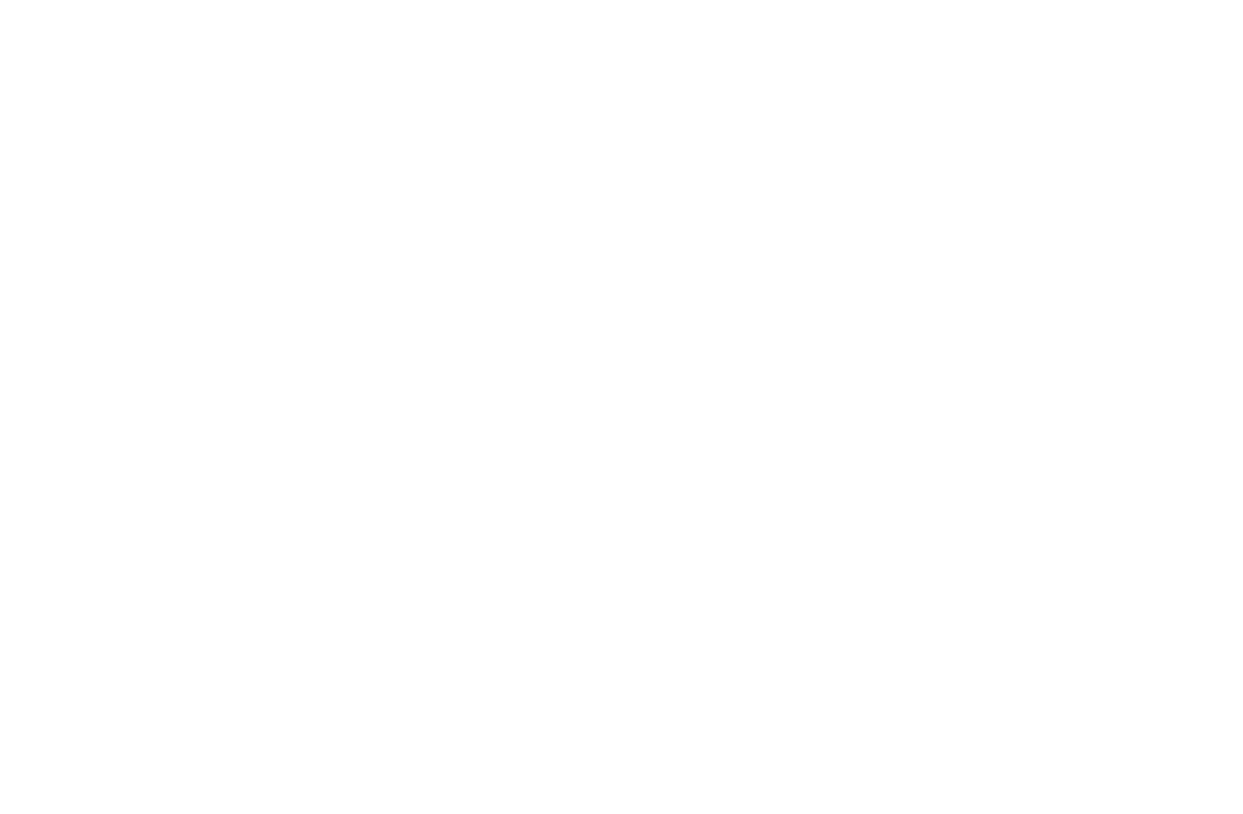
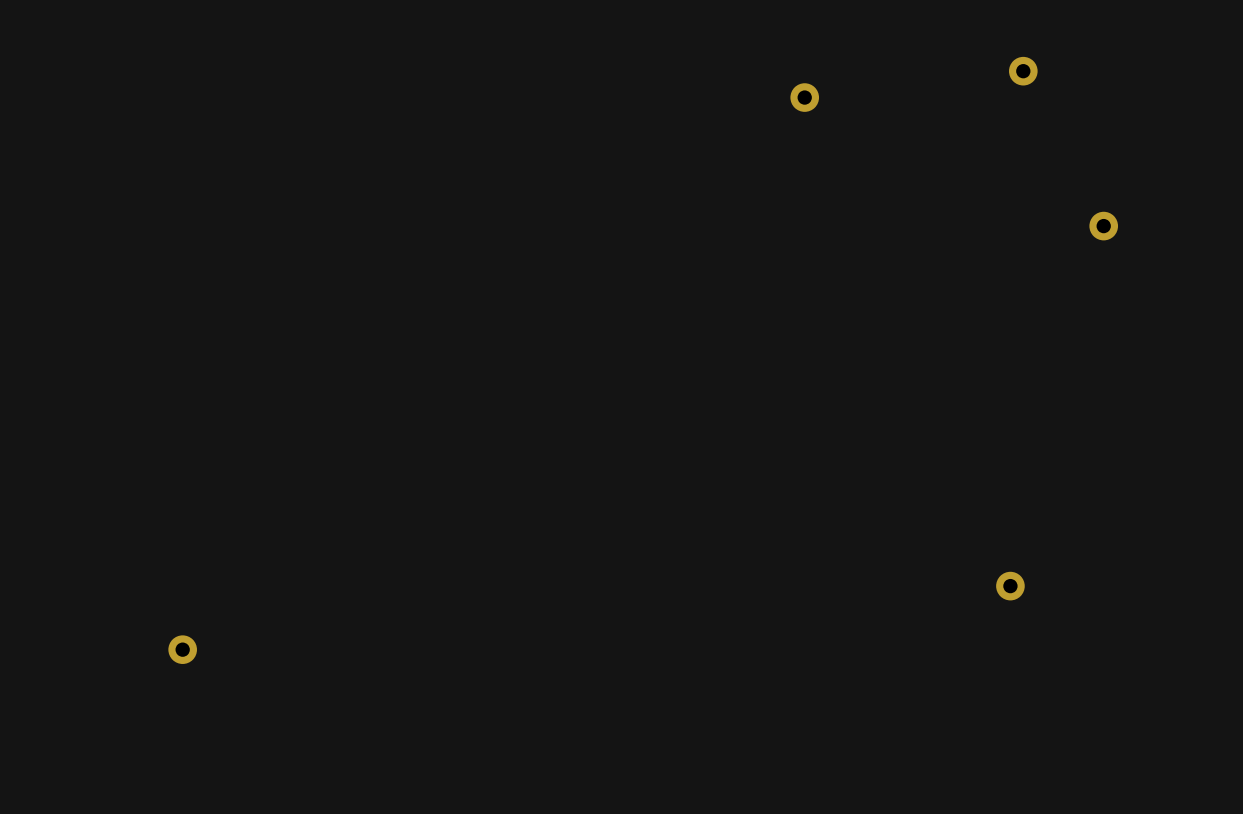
via: none -> (1023, 71)
via: none -> (804, 97)
via: none -> (1103, 226)
via: none -> (1010, 586)
via: none -> (182, 649)

